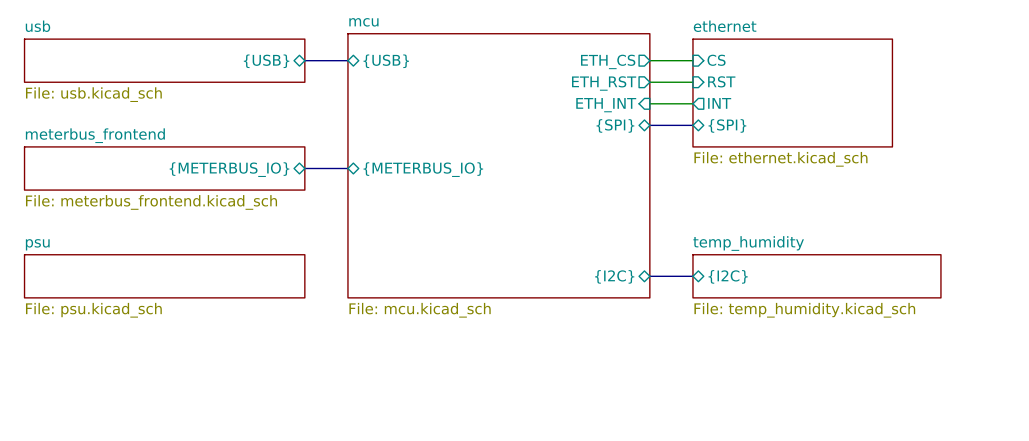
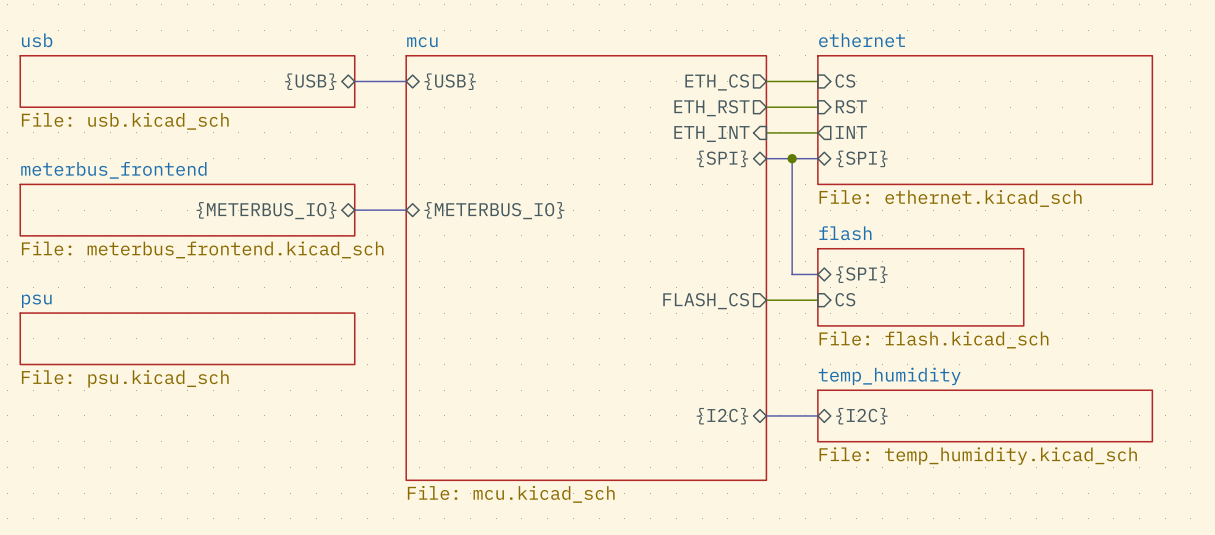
sheet ethernet: File: ethernet.kicad_sch (792, 93) -> none
sheet ethernet: none -> File: ethernet.kicad_sch (985, 120)
bus: none -> (792, 158) (792, 274) (817, 274)
junction: none -> (792, 158)
sheet mcu: File: mcu.kicad_sch (498, 165) -> none
sheet mcu: none -> File: mcu.kicad_sch (586, 268)
sheet pin: none -> {SPI} (861, 274)
sheet flash: none -> File: flash.kicad_sch (920, 287)
wire: none -> (766, 300) (817, 300)
sheet pin: none -> CS (845, 299)
sheet pin: none -> FLASH_CS (706, 301)
sheet pin: {I2C} (614, 276) -> none
bus: (649, 276) (692, 276) -> (766, 415) (817, 415)
sheet pin: {I2C} (728, 276) -> none
sheet temp_humidity: File: temp_humidity.kicad_sch (816, 276) -> none
sheet pin: none -> {I2C} (722, 416)
sheet pin: none -> {I2C} (861, 416)
sheet temp_humidity: none -> File: temp_humidity.kicad_sch (985, 415)

